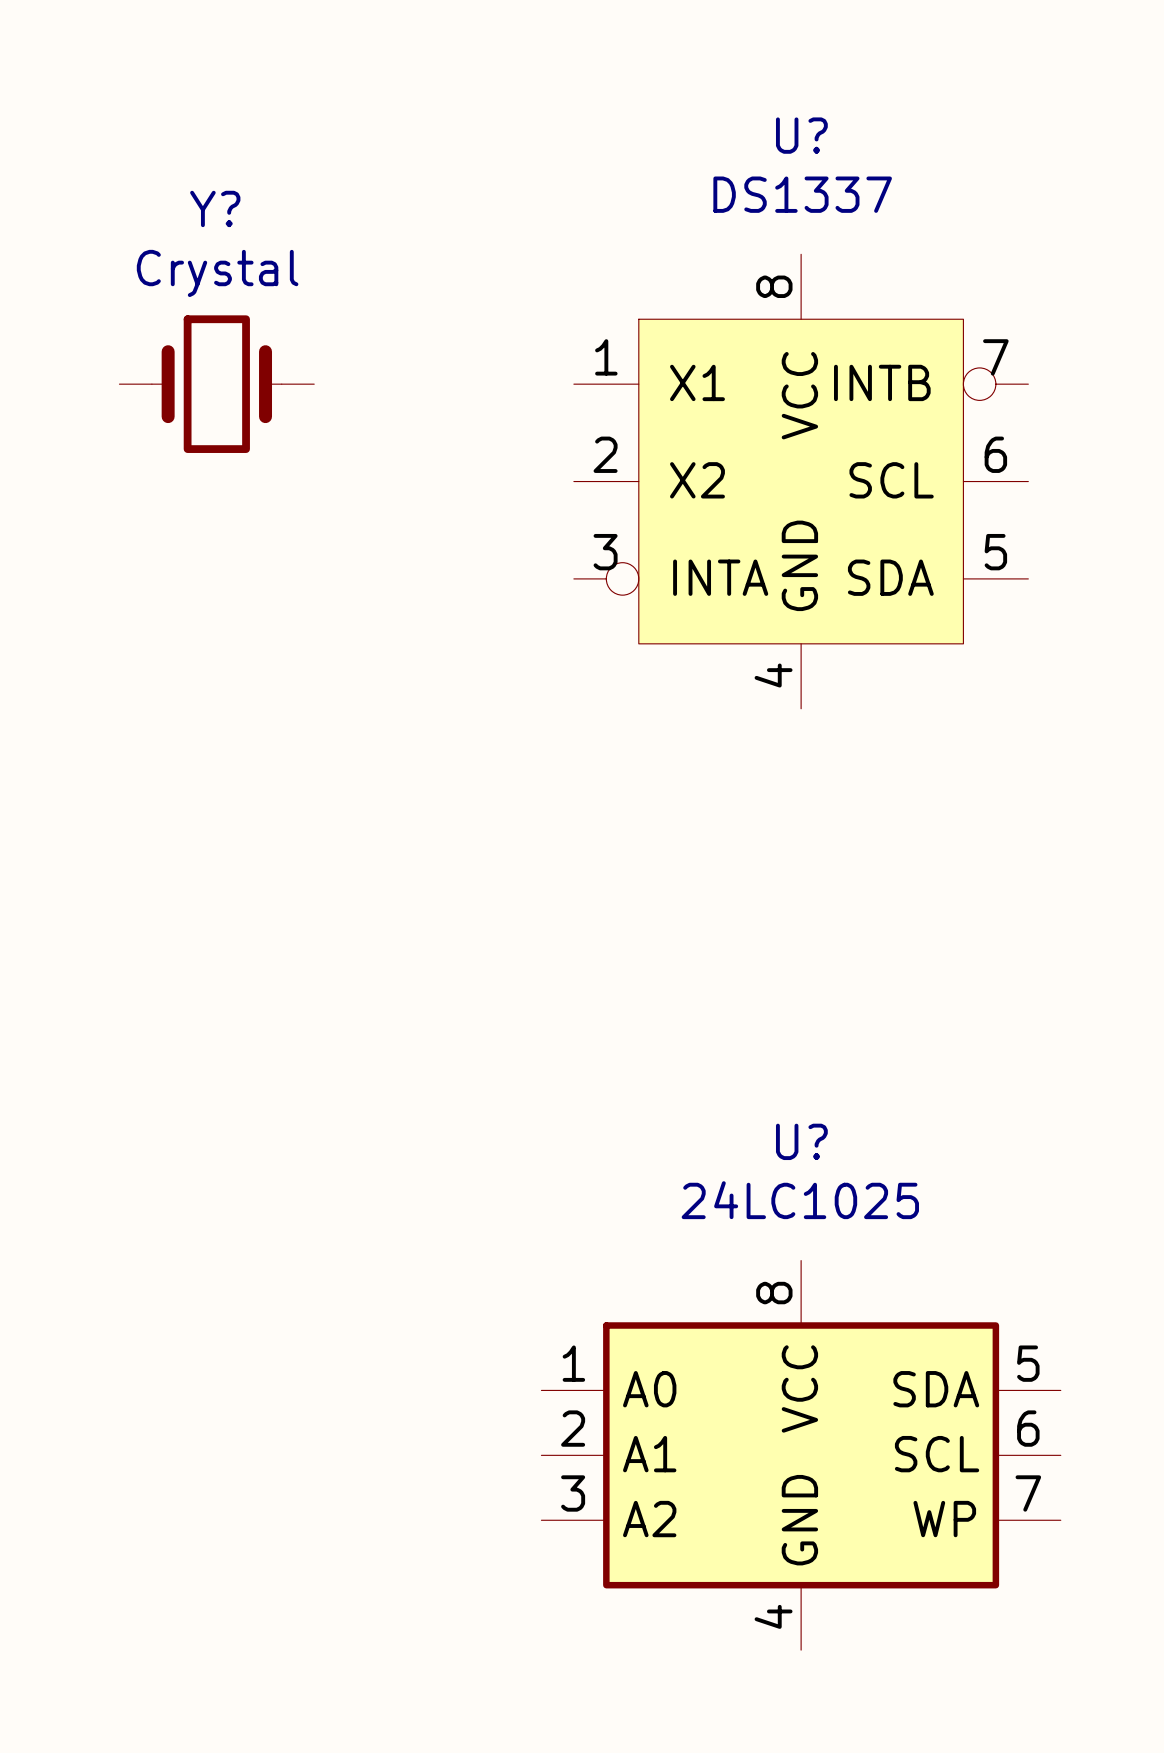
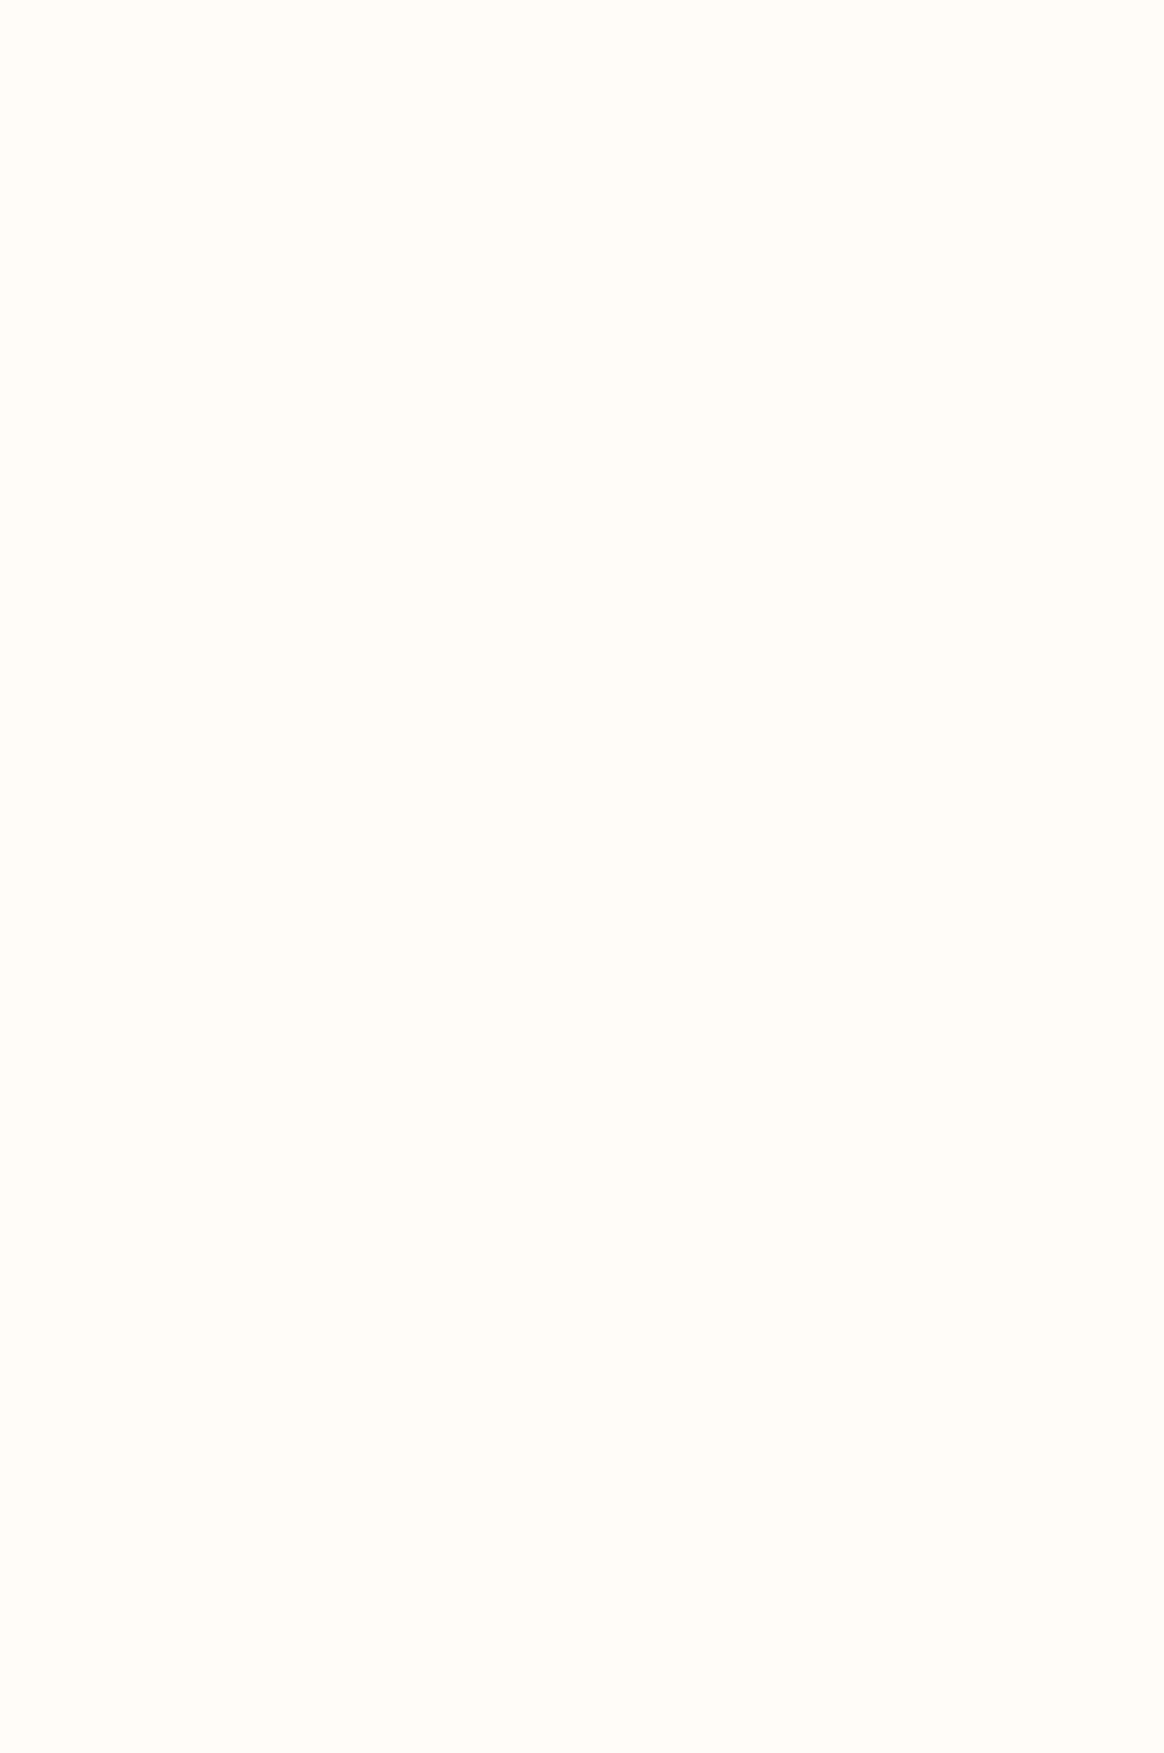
Y?: Crystal (216, 384) -> none
U?: DS1337 (801, 481) -> none
U?: 24LC1025 (801, 1455) -> none

